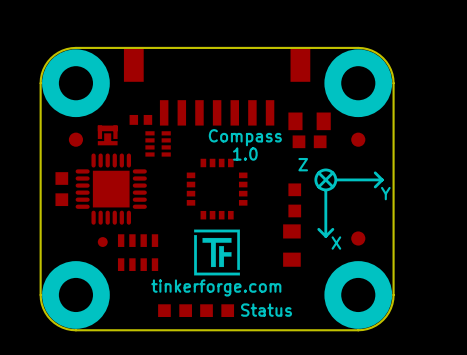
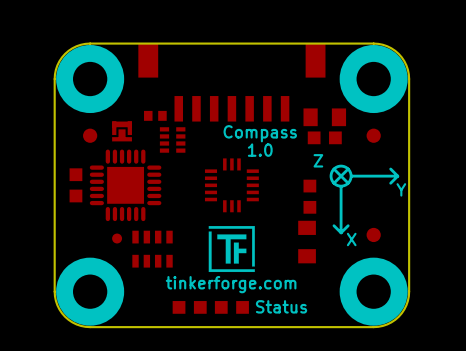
part footprint: [186, 158, 248, 220] -> [204, 158, 259, 213]

